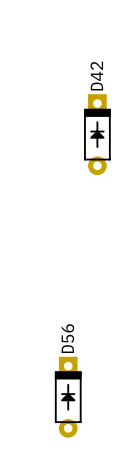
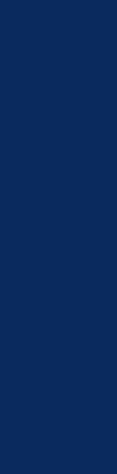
D42: (97, 134) -> none
D56: (68, 397) -> none

